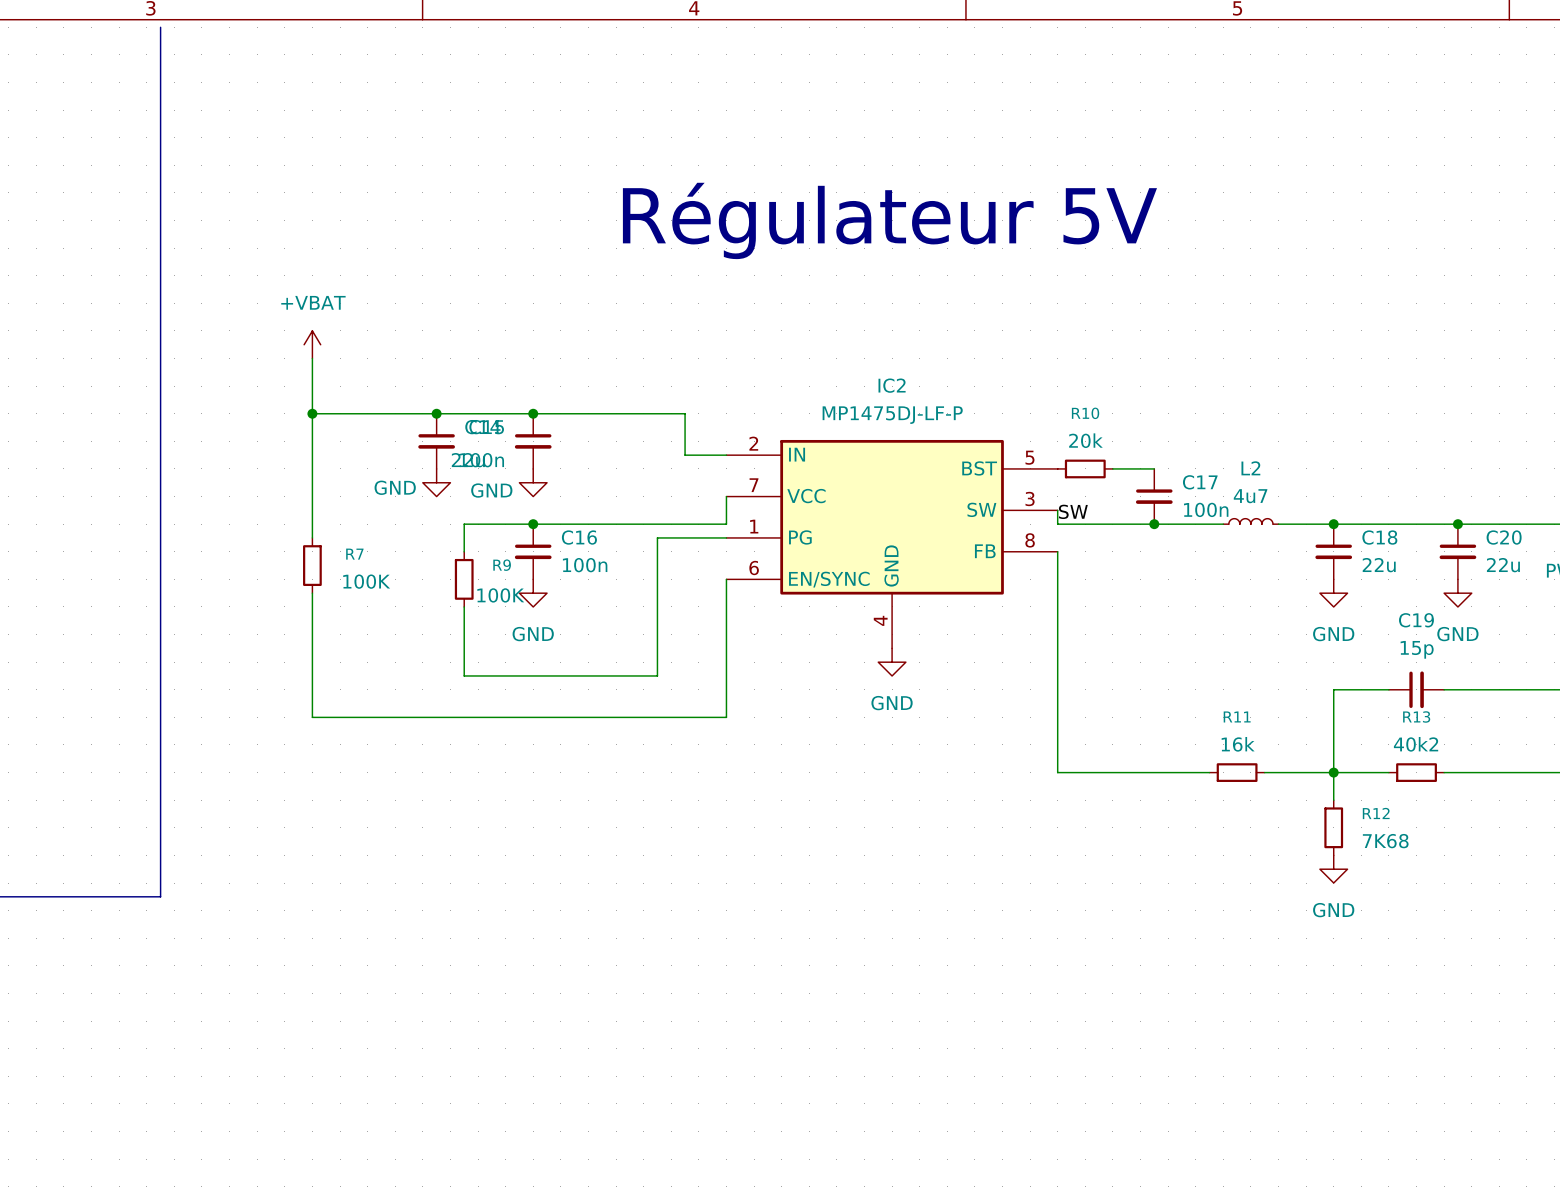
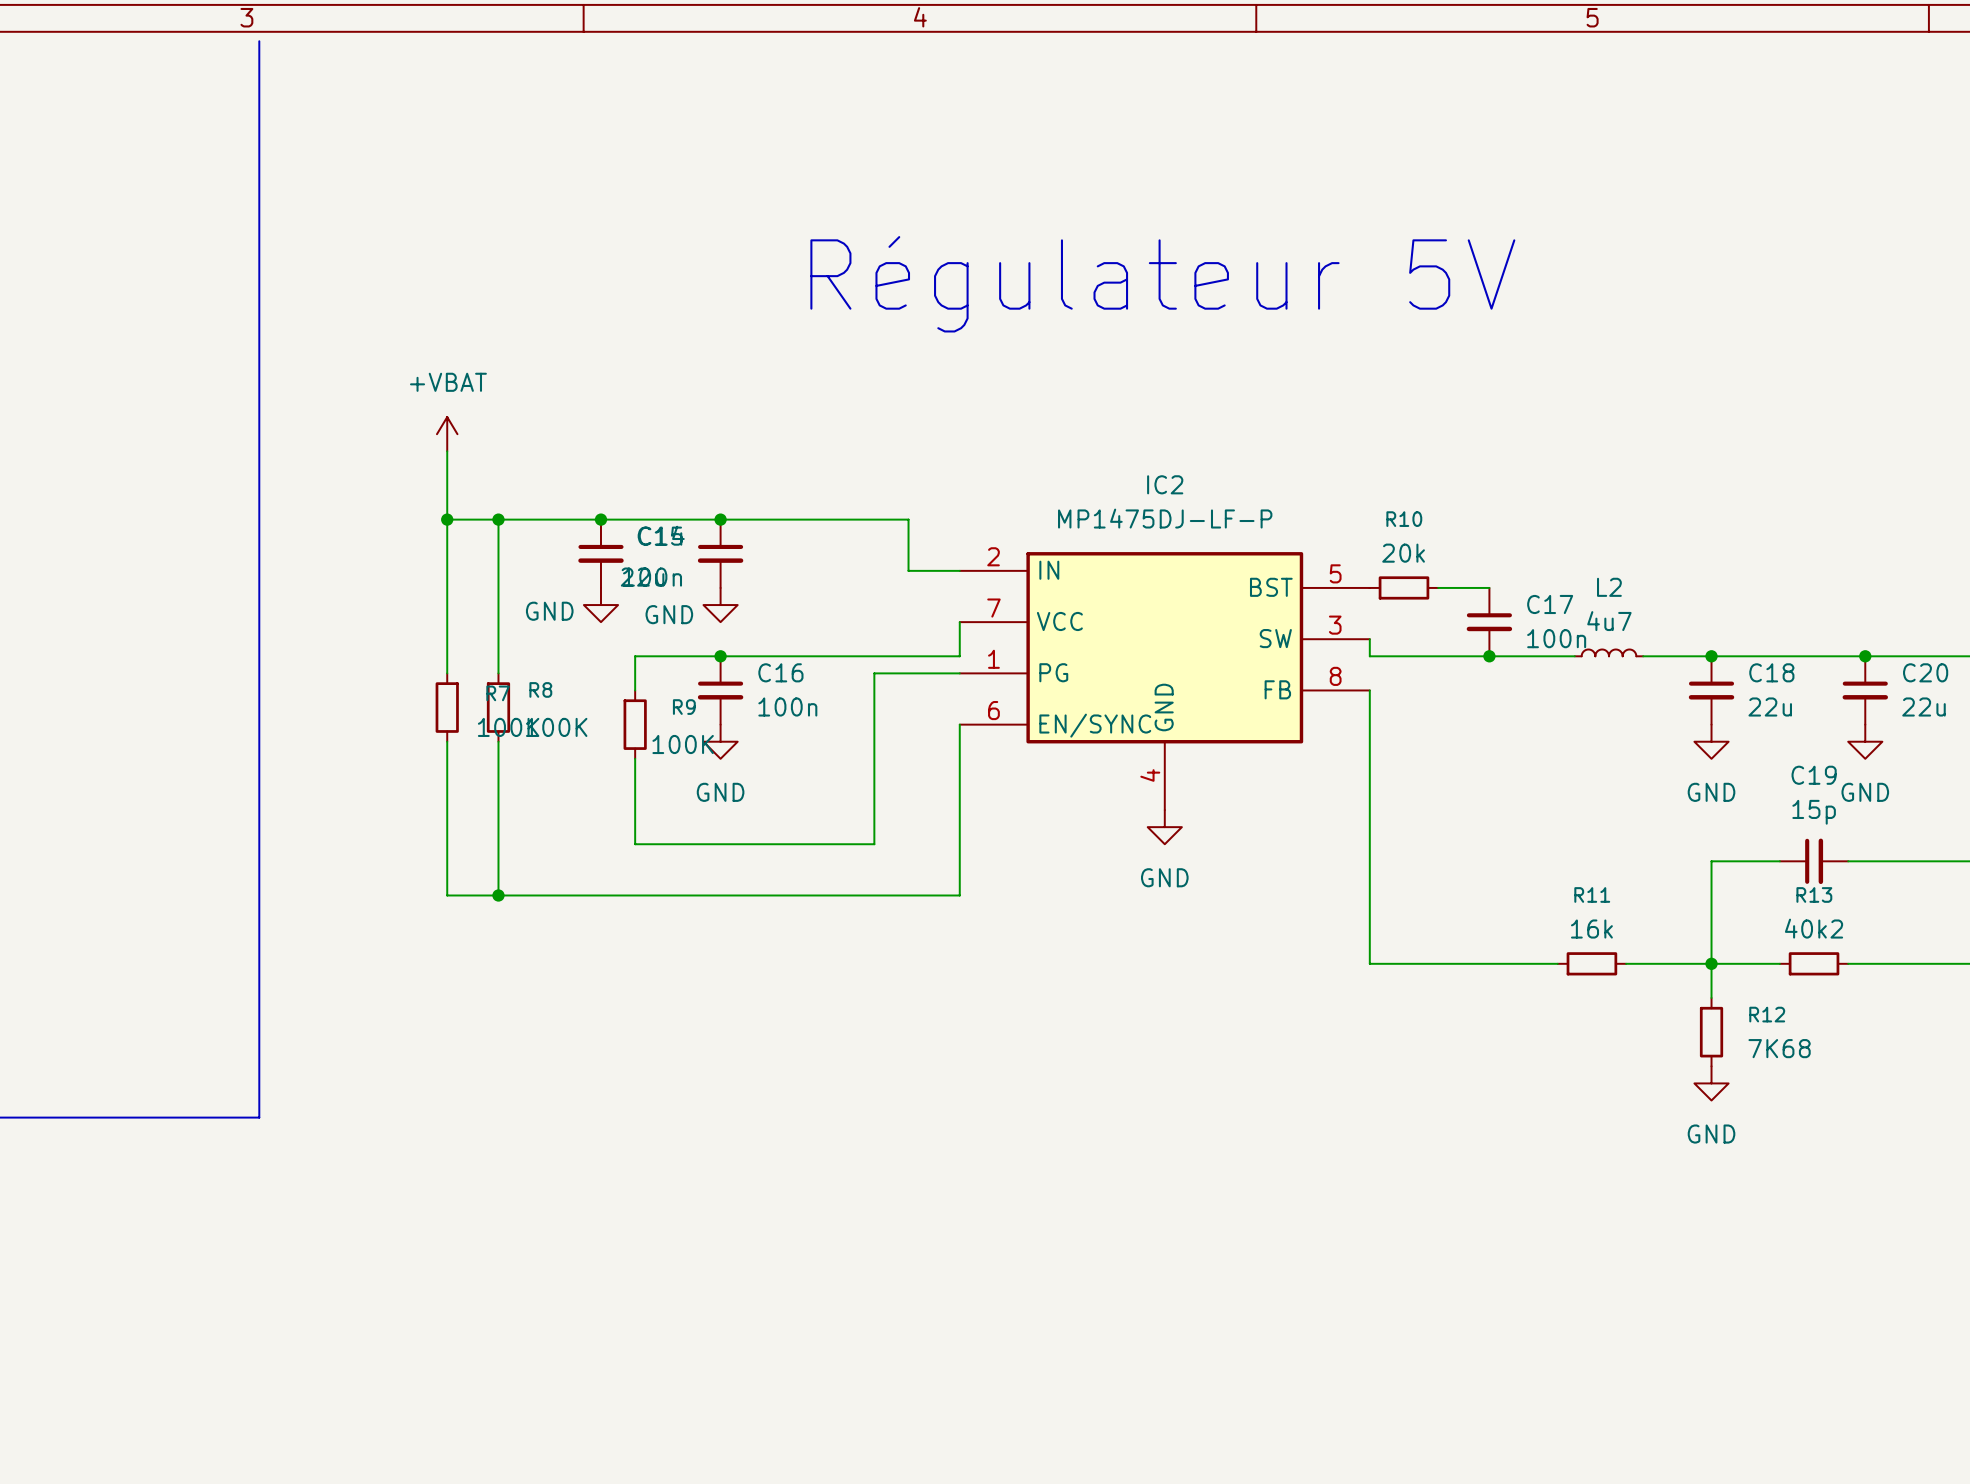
wire: none -> (498, 519) (498, 673)
junction: none -> (498, 519)
label: SW (1073, 511) -> none
R8: none -> 100K (498, 707)
wire: none -> (498, 741) (498, 895)
junction: none -> (498, 895)

